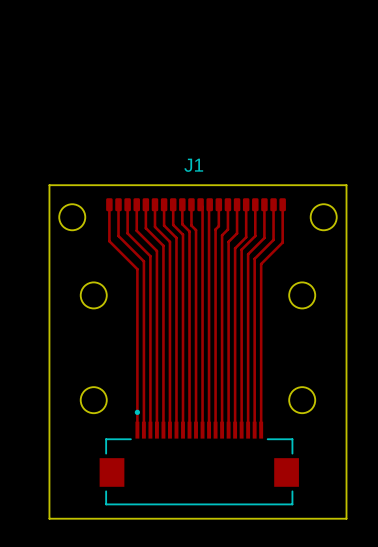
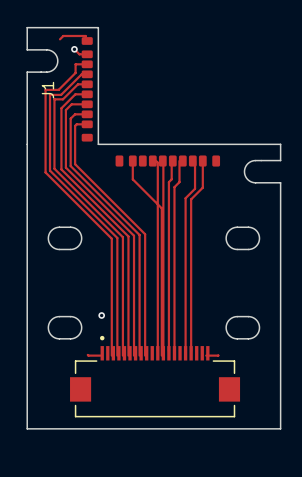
track: none -> (60, 39) (63, 35) (85, 35) (87, 40)
track: none -> (74, 49) (79, 54) (87, 54)
via: none -> (74, 49)
track: none -> (87, 64) (75, 64) (75, 72) (58, 89) (45, 89) (45, 172) (111, 238) (111, 355)
track: none -> (87, 74) (81, 74) (61, 94) (50, 94) (50, 170) (117, 237) (117, 355)
track: none -> (87, 84) (77, 84) (62, 99) (54, 99) (54, 168) (122, 237) (122, 355)
track: none -> (87, 94) (75, 94) (61, 108) (61, 169) (128, 236) (128, 355)
track: none -> (87, 104) (71, 104) (65, 110) (65, 167) (134, 235) (134, 355)
track: none -> (87, 114) (75, 114) (70, 118) (70, 166) (139, 234) (139, 355)
track: none -> (87, 124) (75, 125) (75, 164) (145, 234) (145, 355)
J1 name position: J1 (193, 165) -> J1 (47, 90)
board edge: (49, 185) (132, 185) -> (27, 144) (27, 72) (50, 71) (55, 67) (57, 60) (55, 54) (50, 50) (27, 49) (27, 27) (98, 27) (98, 144)
J1 footprint: [106, 198, 286, 212] -> [81, 37, 93, 142]
round board edge: [58, 203, 86, 231] -> none
round board edge: [310, 203, 338, 231] -> none
track: (109, 204) (109, 241) (137, 269) (137, 427) -> none
track: (118, 204) (118, 236) (143, 261) (143, 427) -> none
track: (127, 204) (127, 233) (150, 256) (150, 427) -> none
track: (136, 204) (136, 230) (156, 250) (156, 427) -> none
track: (145, 204) (145, 228) (163, 245) (163, 427) -> none
track: (154, 204) (154, 226) (169, 241) (169, 427) -> none
track: (164, 204) (164, 225) (176, 237) (176, 427) -> none
track: (182, 204) (182, 224) (189, 231) (189, 427) -> none
track: (191, 204) (191, 225) (196, 230) (196, 427) -> none
part: none -> (167, 161)
track: (237, 204) (237, 233) (228, 241) (228, 427) -> none
track: (264, 204) (264, 237) (248, 254) (248, 427) -> none
track: (273, 204) (273, 239) (254, 258) (254, 427) -> none
track: (282, 204) (282, 242) (261, 264) (261, 427) -> none
board edge: (346, 204) (346, 230) -> (280, 160) (252, 160) (246, 164) (244, 171) (246, 178) (252, 182) (280, 182)
track: (173, 224) (182, 234) (182, 427) -> (132, 178) (161, 208) (161, 355)
round board edge: [80, 282, 108, 309] -> none
board edge: none -> (59, 227) (72, 227) (78, 230) (81, 238) (78, 246) (70, 249) (58, 249) (51, 246) (48, 239) (49, 234) (52, 229) (59, 227)
round board edge: [288, 282, 316, 309] -> none
board edge: none -> (237, 227) (249, 227) (256, 230) (259, 238) (256, 246) (248, 249) (235, 249) (229, 246) (226, 239) (227, 234) (230, 229) (237, 227)
via: none -> (101, 315)
round board edge: [80, 386, 108, 414] -> none
round board edge: [288, 386, 316, 414] -> none
board edge: none -> (59, 316) (72, 316) (78, 319) (81, 327) (78, 335) (72, 338) (59, 338) (51, 335) (48, 329) (49, 322) (54, 317) (59, 316)
board edge: none -> (237, 316) (249, 316) (256, 319) (259, 327) (256, 335) (249, 338) (237, 338) (228, 335) (226, 329) (227, 322) (232, 317) (237, 316)
track: none -> (87, 354) (100, 355)
track: none -> (206, 355) (218, 355)

